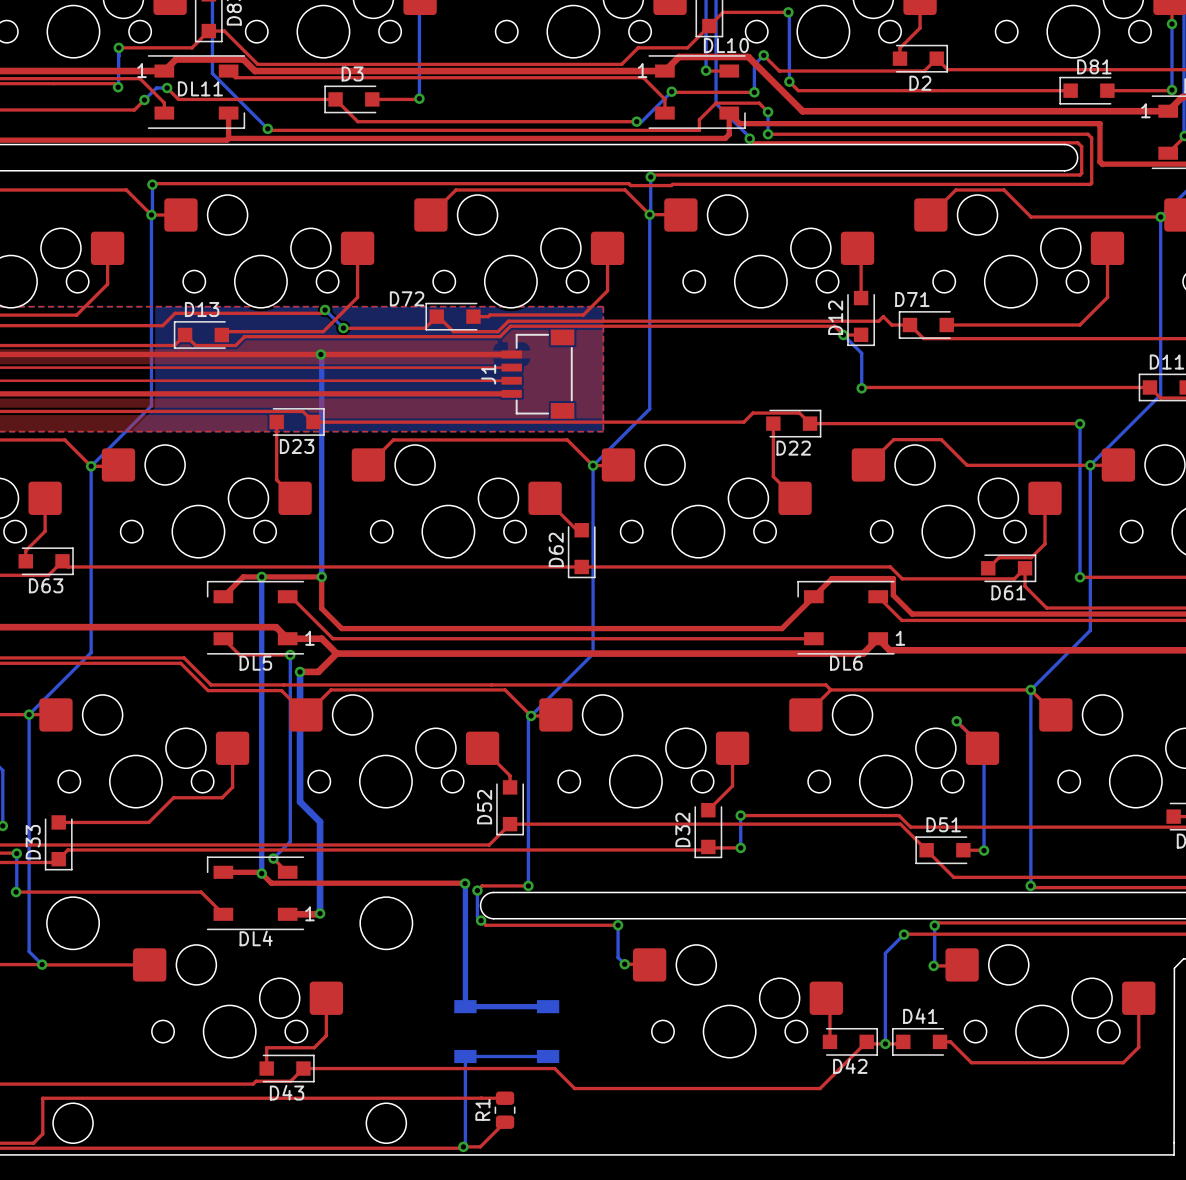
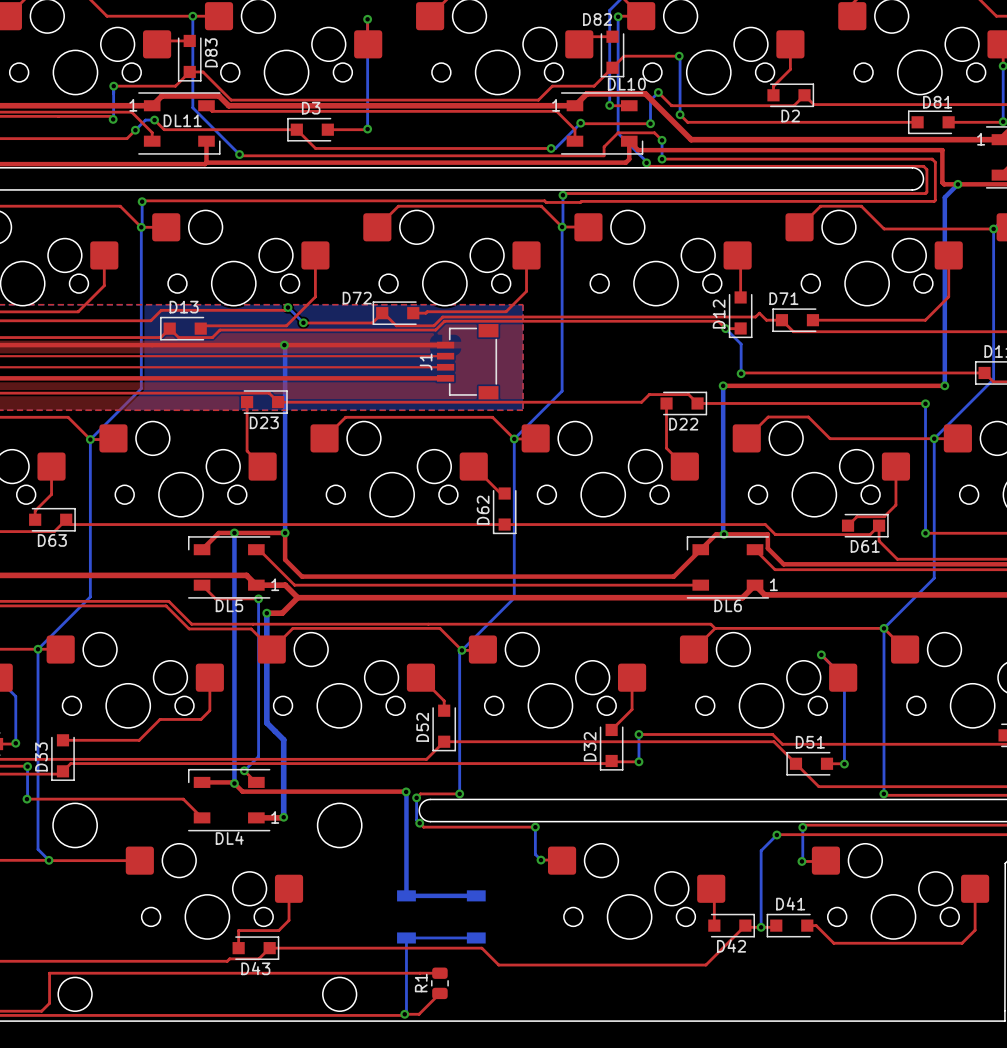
bottom track: none -> (957, 184) (944, 197) (944, 385)
via: none -> (957, 184)
top track: none -> (723, 385) (944, 385)
bottom track: none -> (723, 385) (724, 534)
via: none -> (723, 385)
via: none -> (944, 385)
via: none -> (724, 534)

